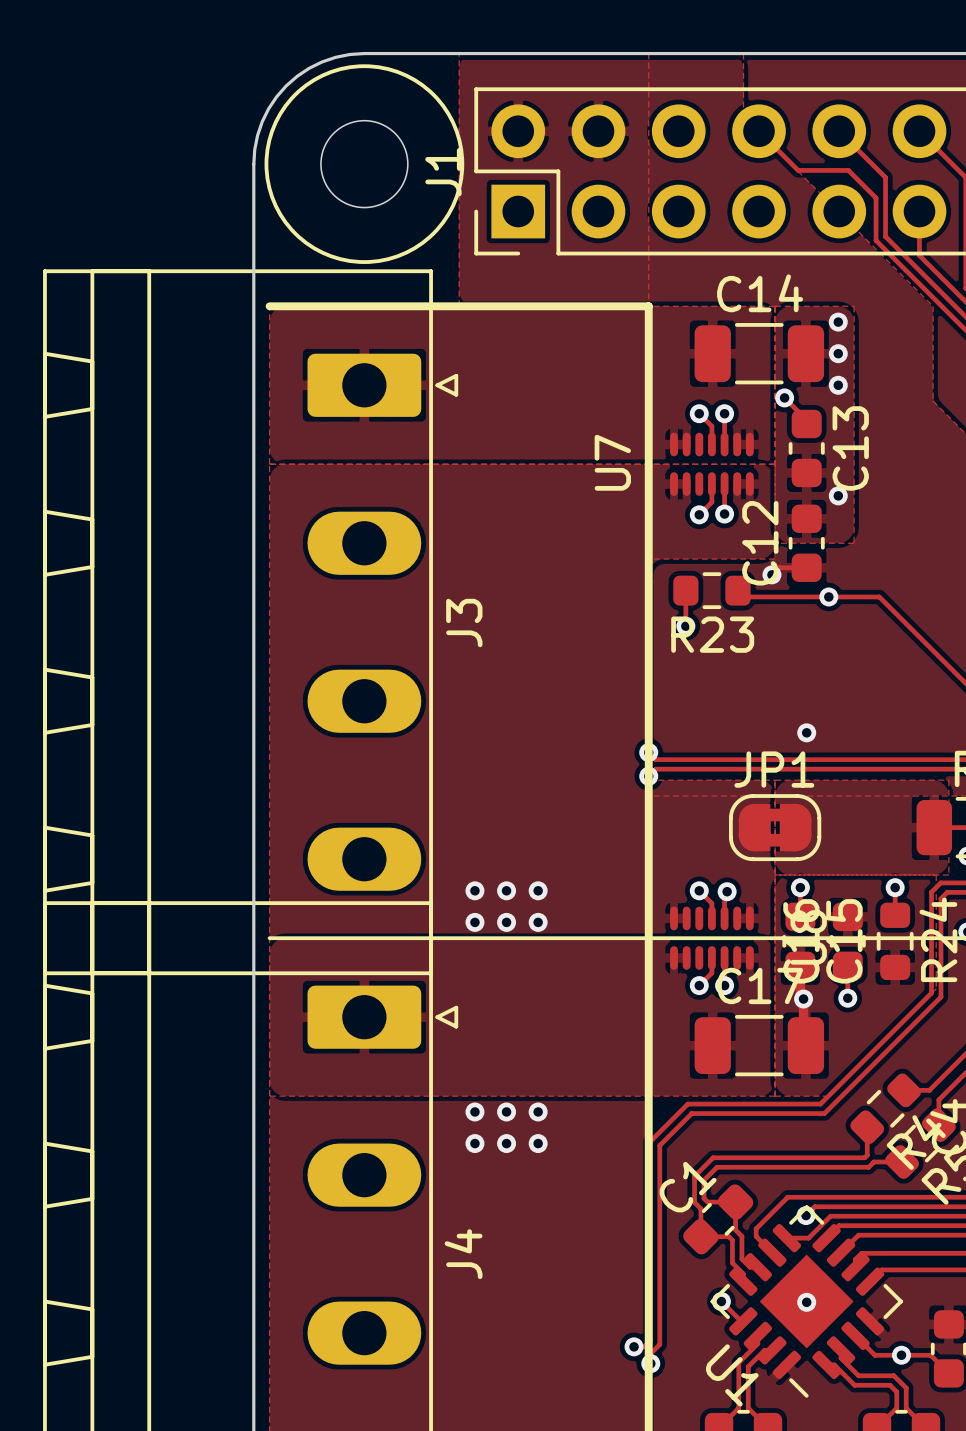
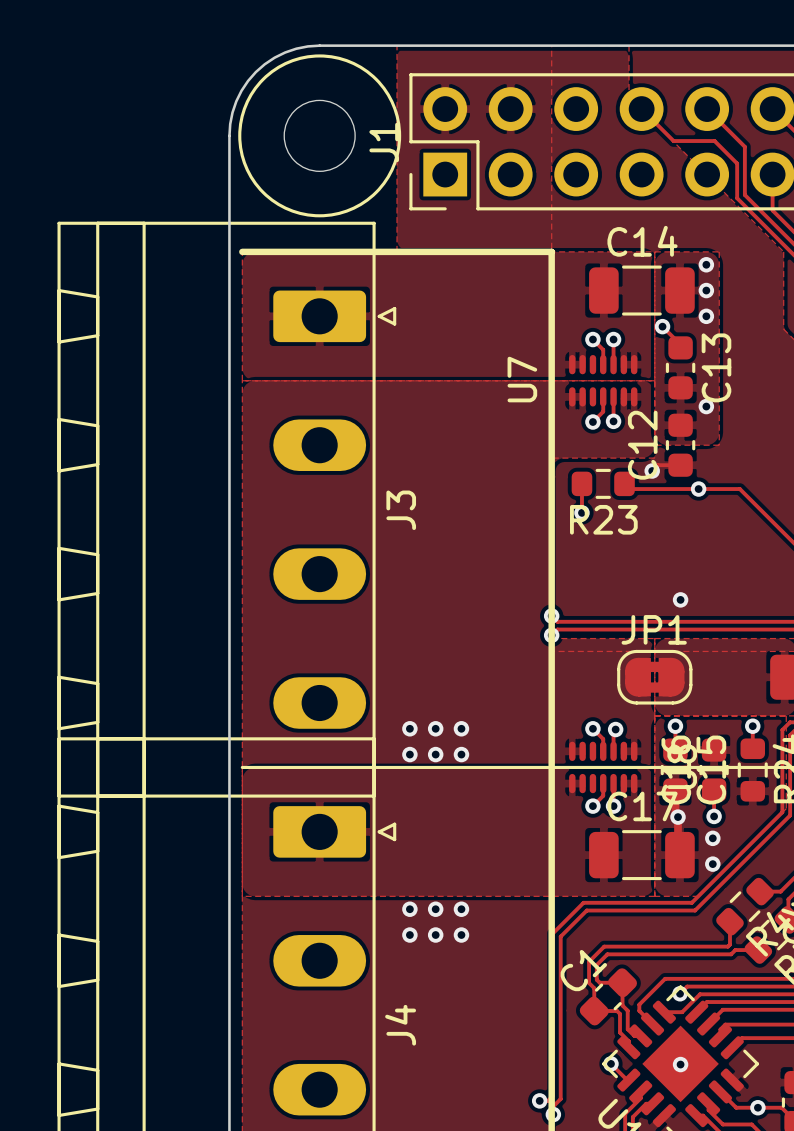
via: none -> (712, 838)
via: none -> (712, 864)

